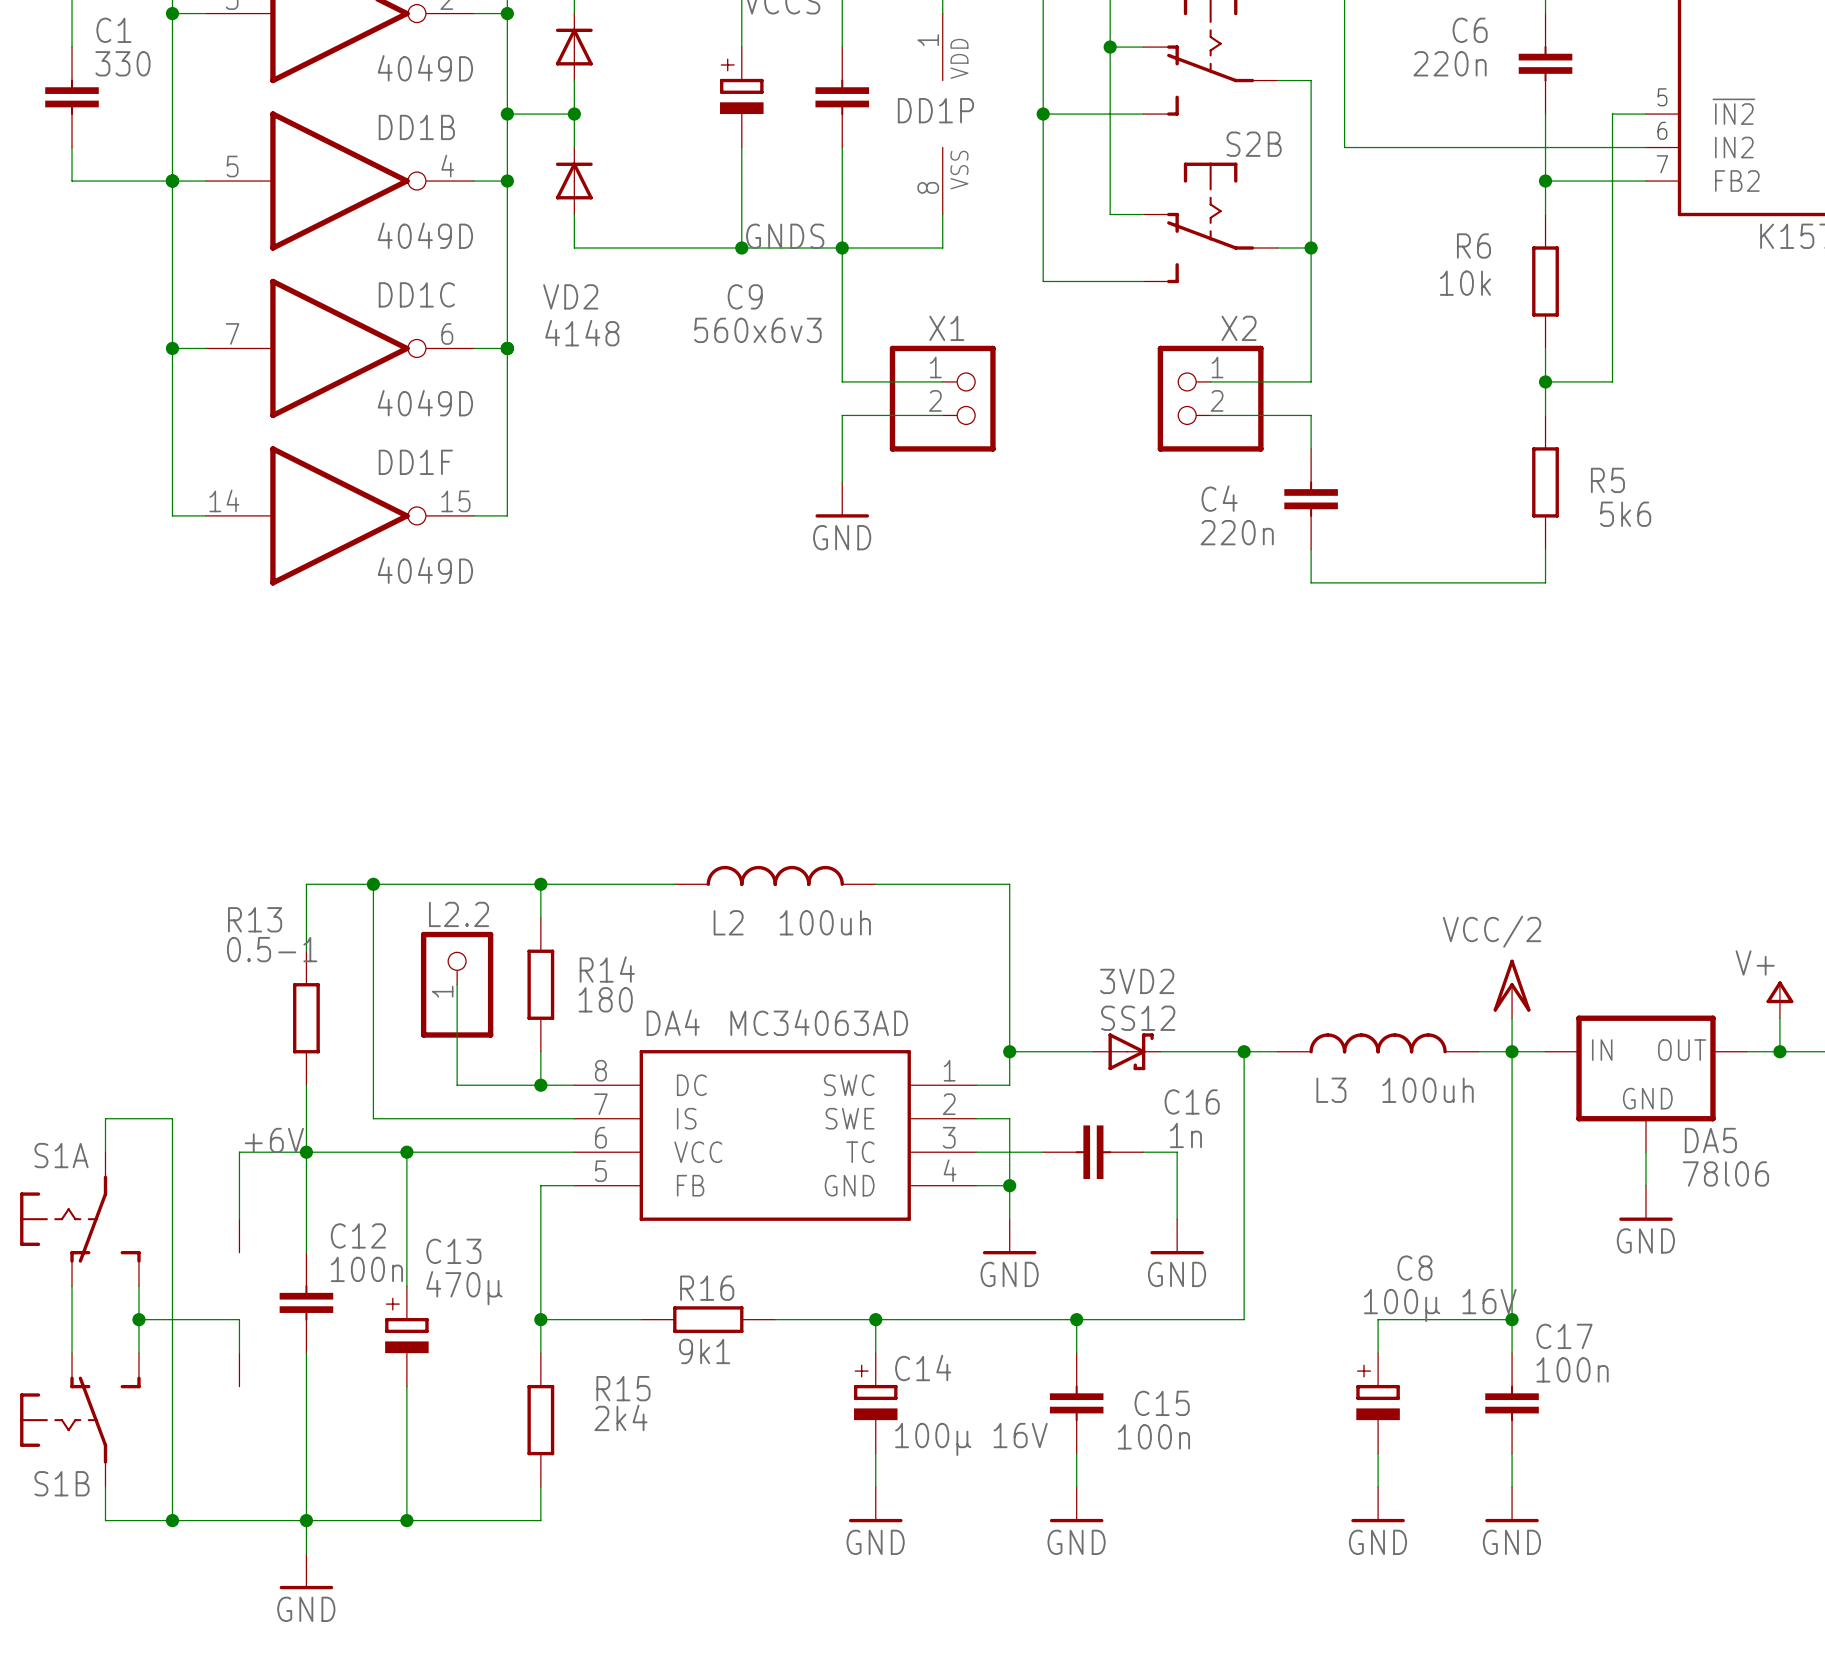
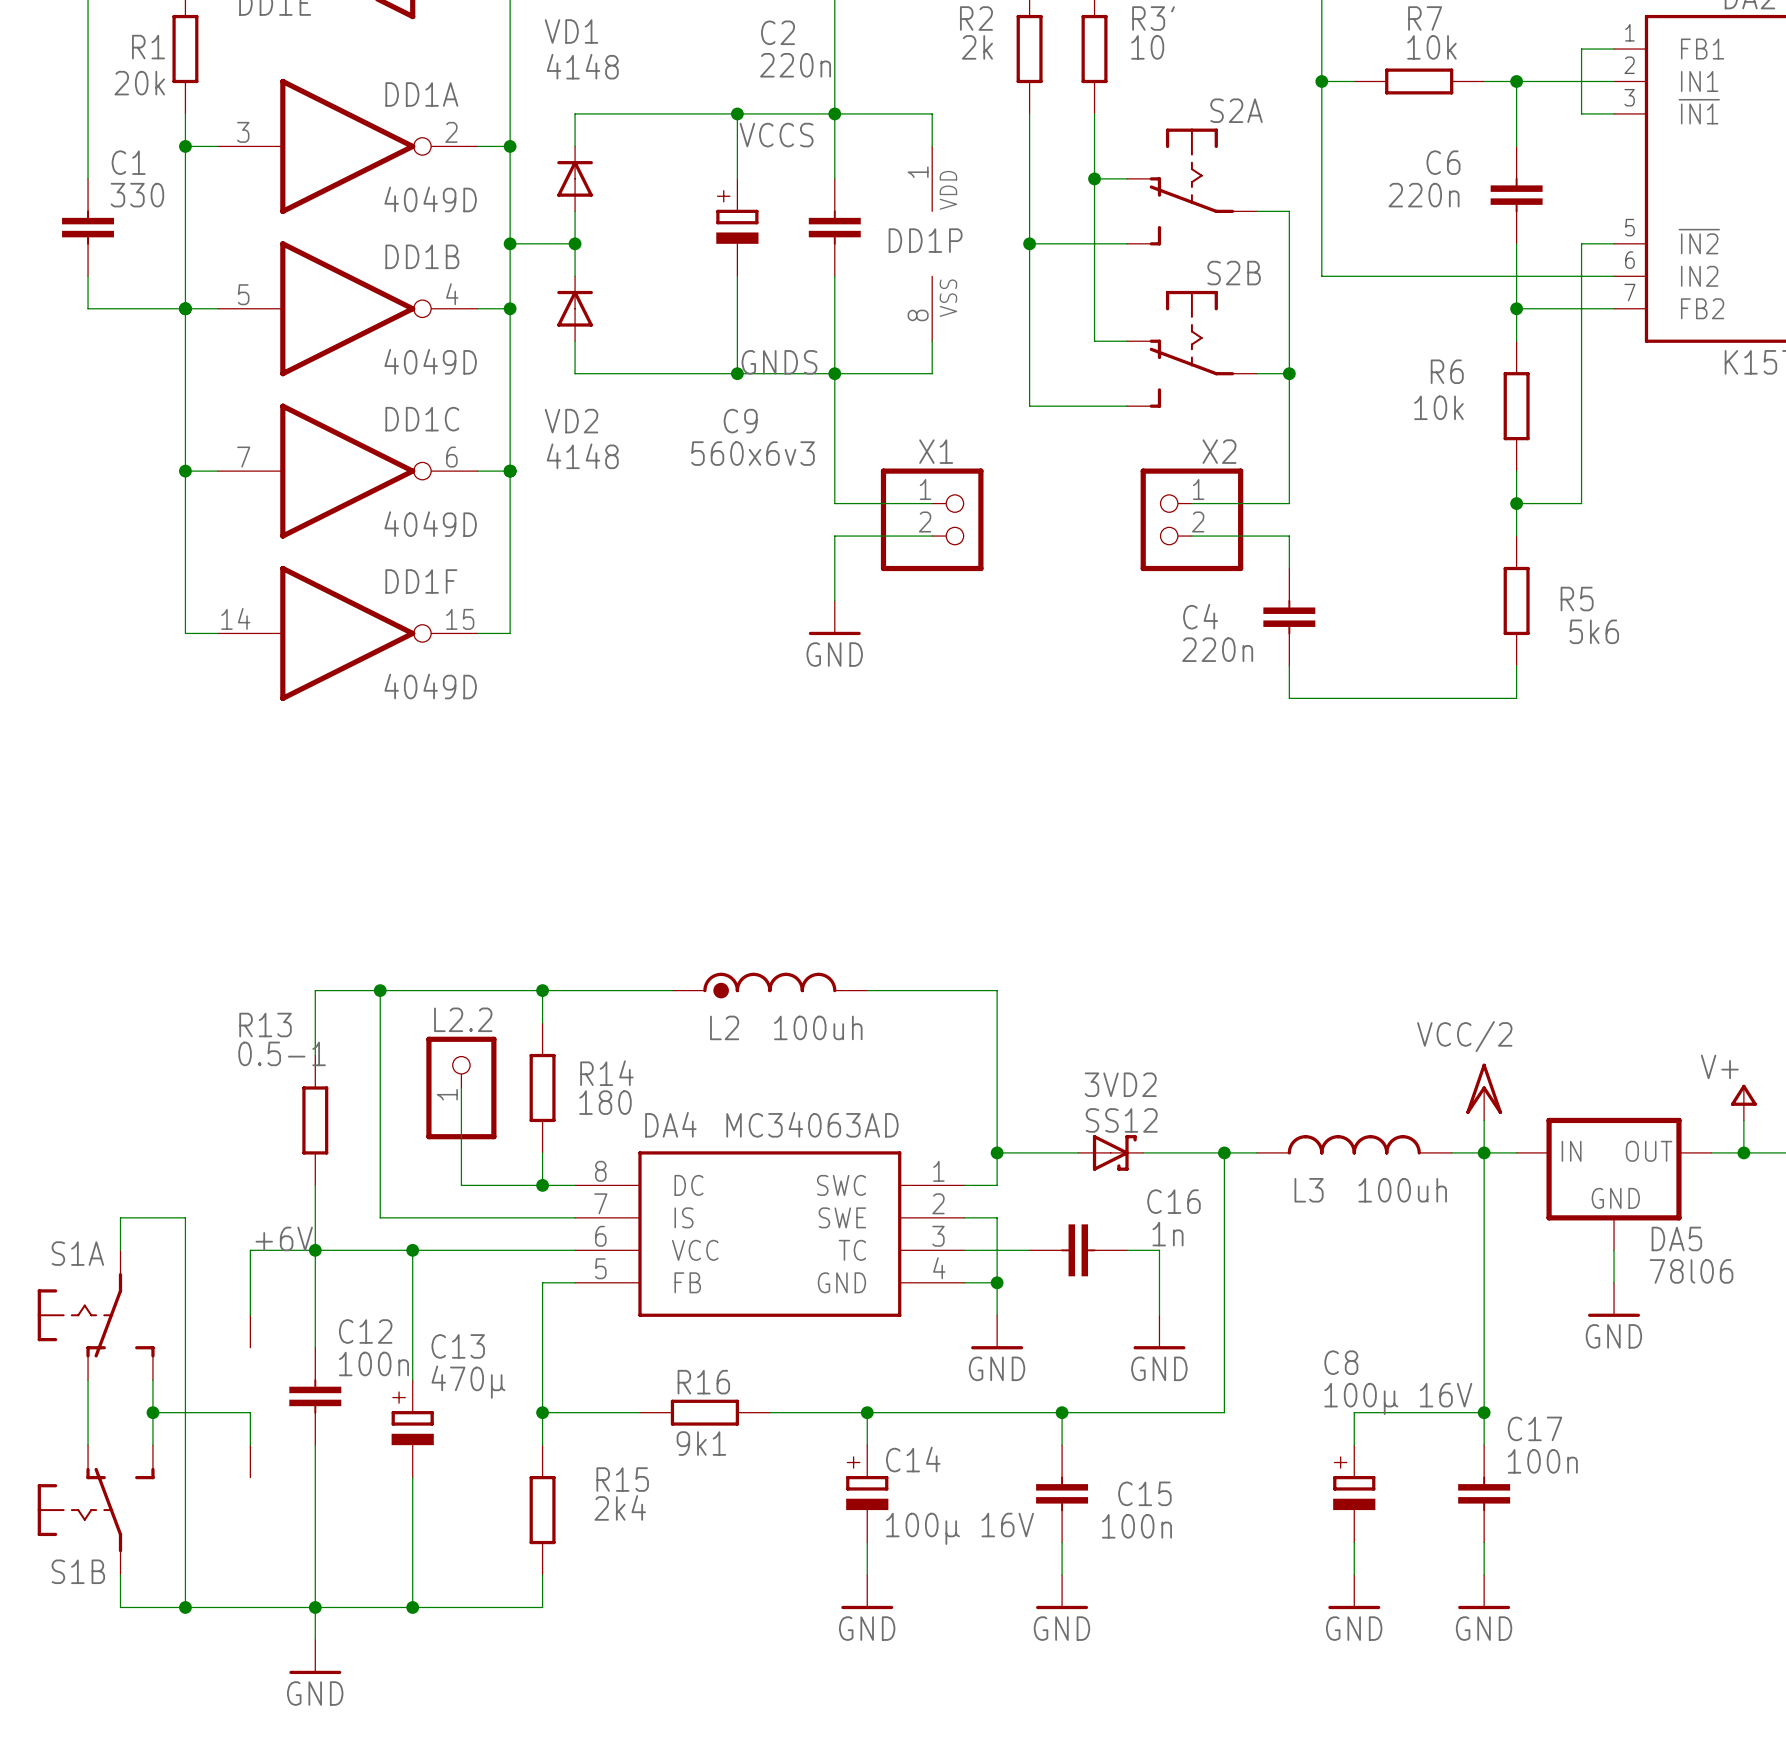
drawing: none -> [713, 982, 729, 999]
C8 name position: C8 (1414, 1268) -> C8 (1341, 1362)
C8 value position: 100µ 16V (1440, 1305) -> 100µ 16V (1398, 1398)

